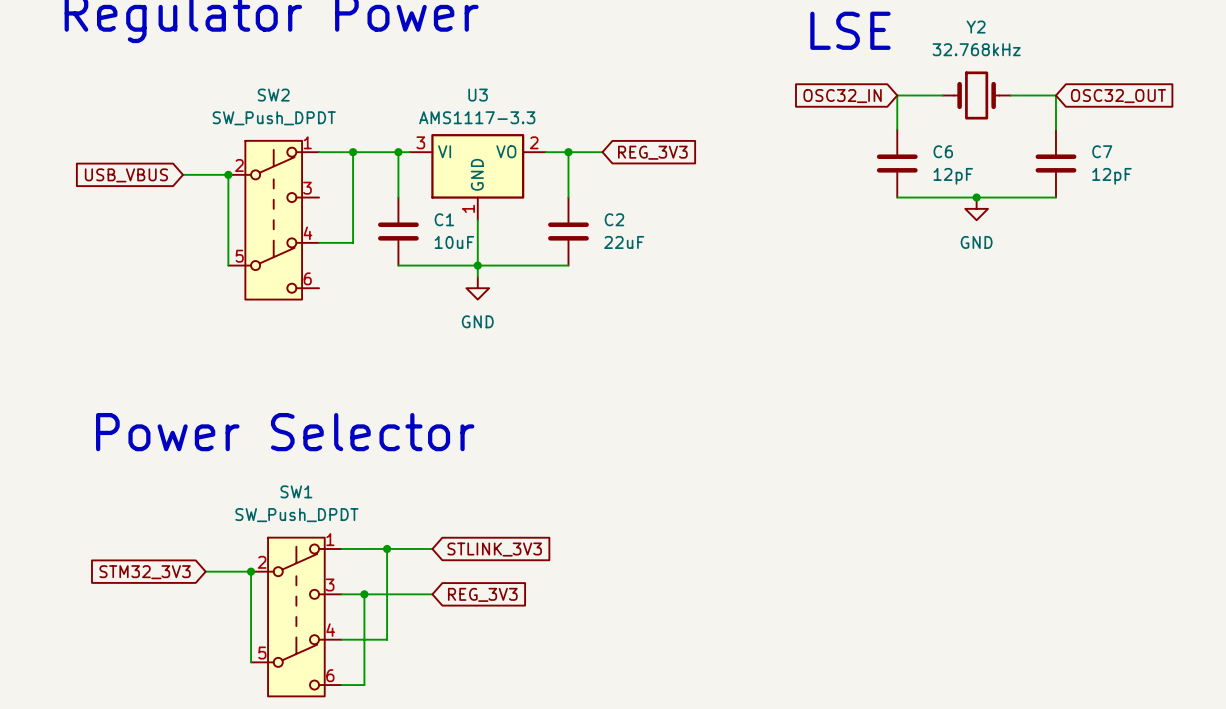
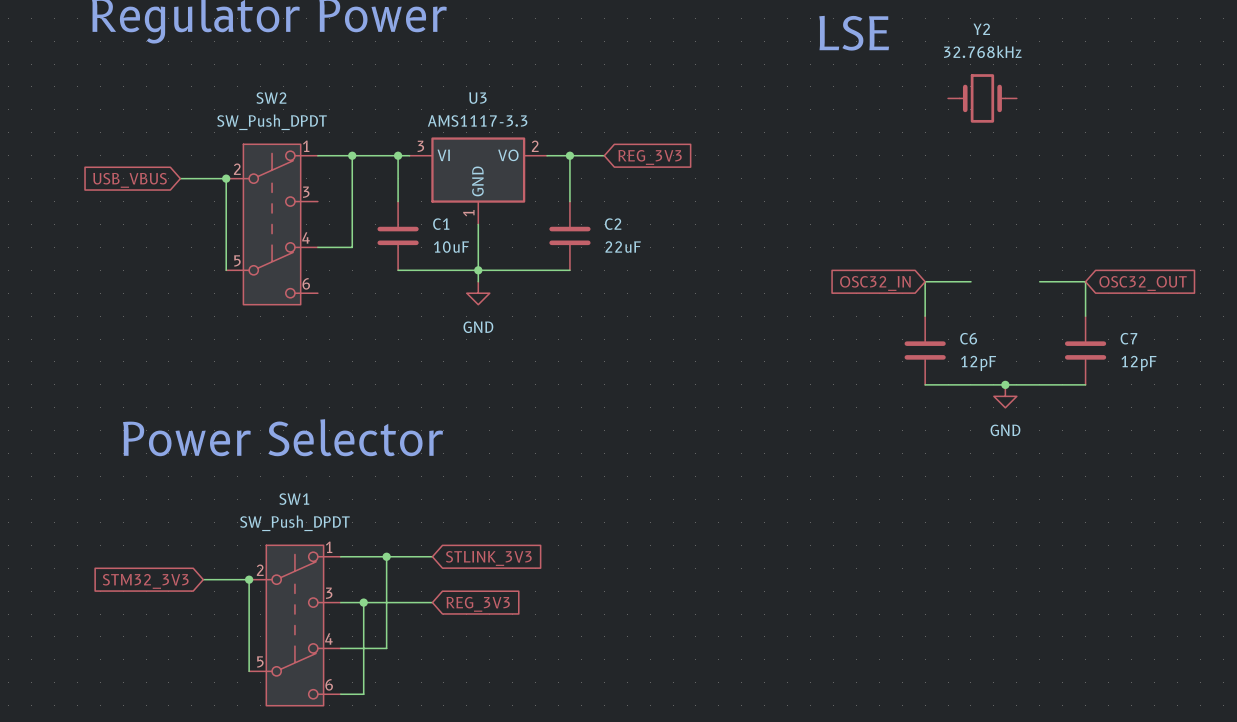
wire: (942, 95) (897, 95) (897, 129) -> (970, 281) (925, 281) (925, 316)
wire: (1010, 95) (1055, 95) (1055, 129) -> (1039, 281) (1085, 281) (1085, 316)
global label position: OSC32_IN (842, 96) -> OSC32_IN (875, 283)
global label position: OSC32_OUT (1118, 96) -> OSC32_OUT (1143, 283)
C6 position: (897, 163) -> (925, 350)
C7 position: (1055, 163) -> (1085, 350)
wire: (897, 197) (1055, 197) -> (925, 384) (1085, 384)
junction: (976, 197) -> none
power symbol position: GND (976, 208) -> GND (1005, 396)
junction: none -> (1005, 384)

